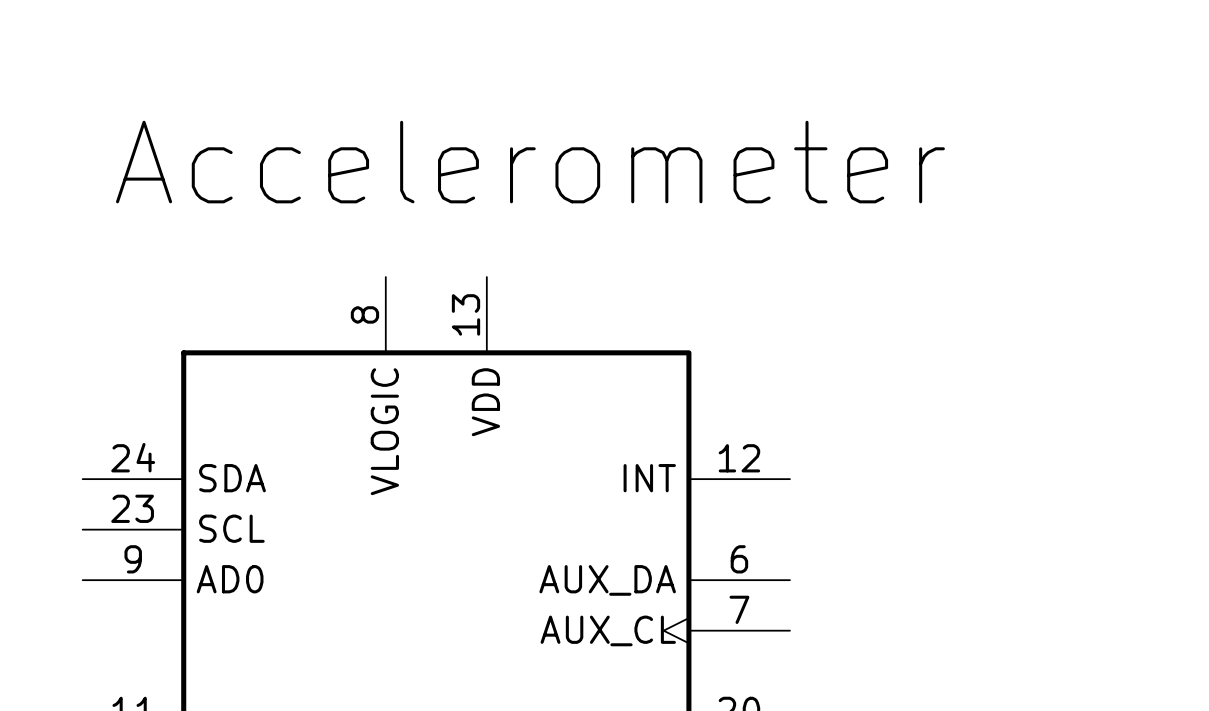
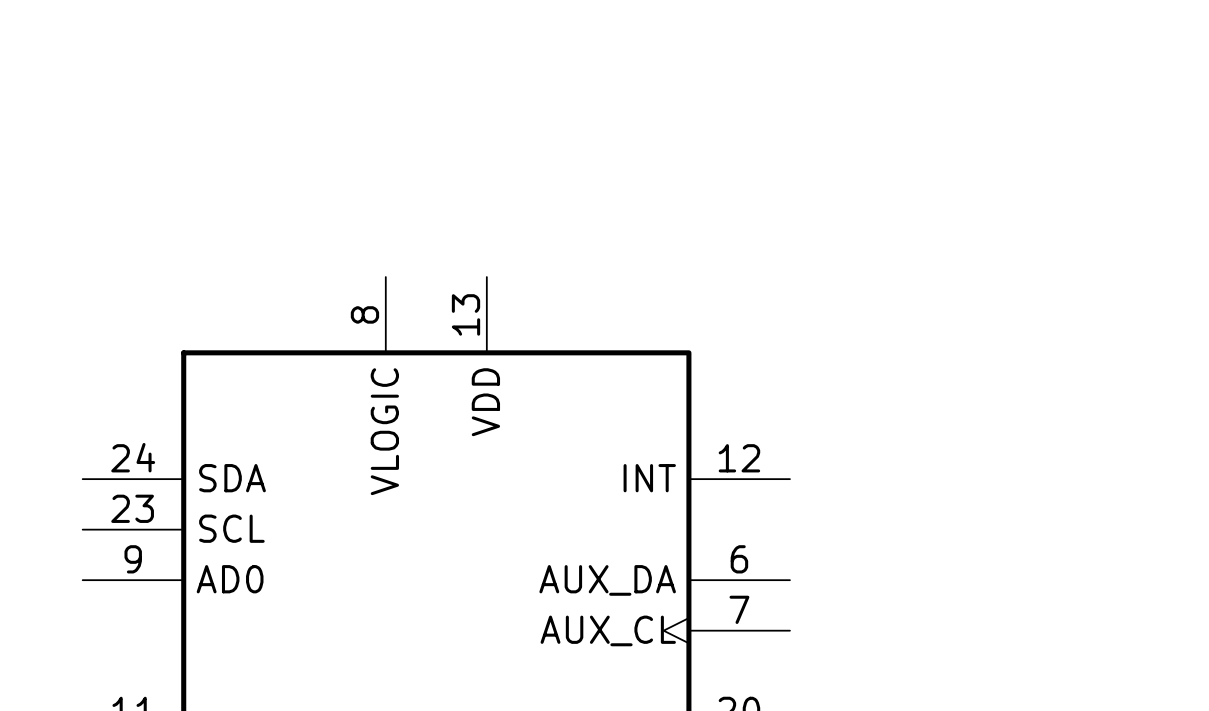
label: Accelerometer (530, 162) -> none

